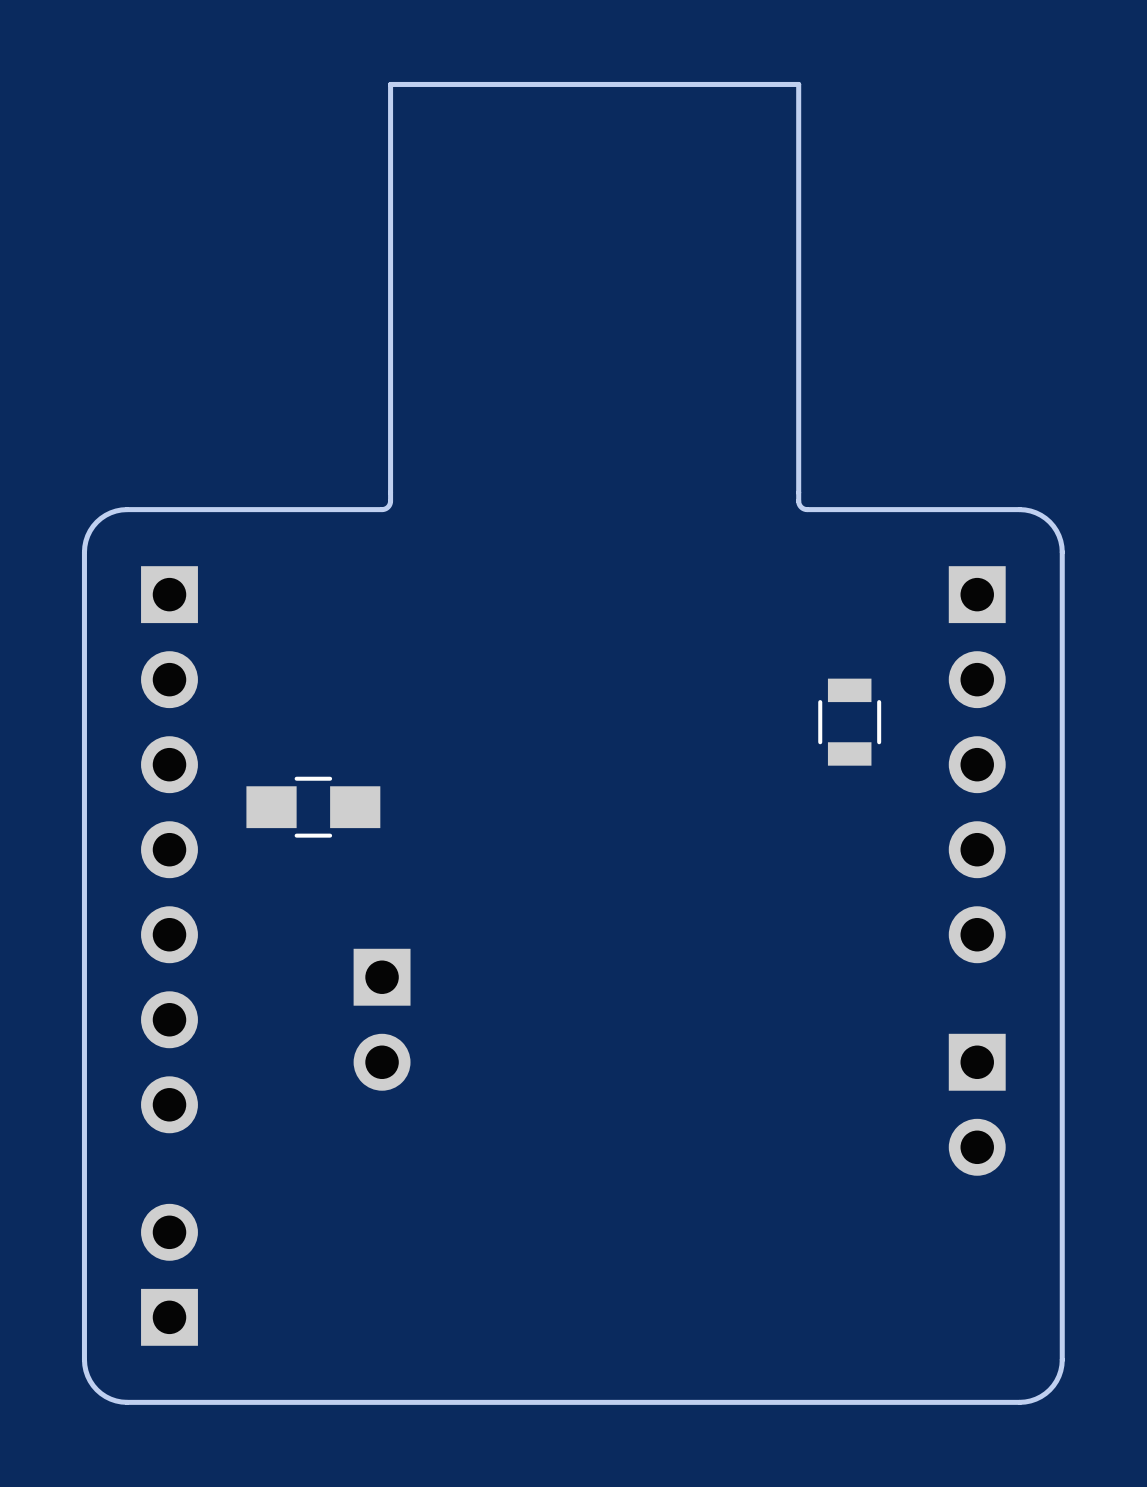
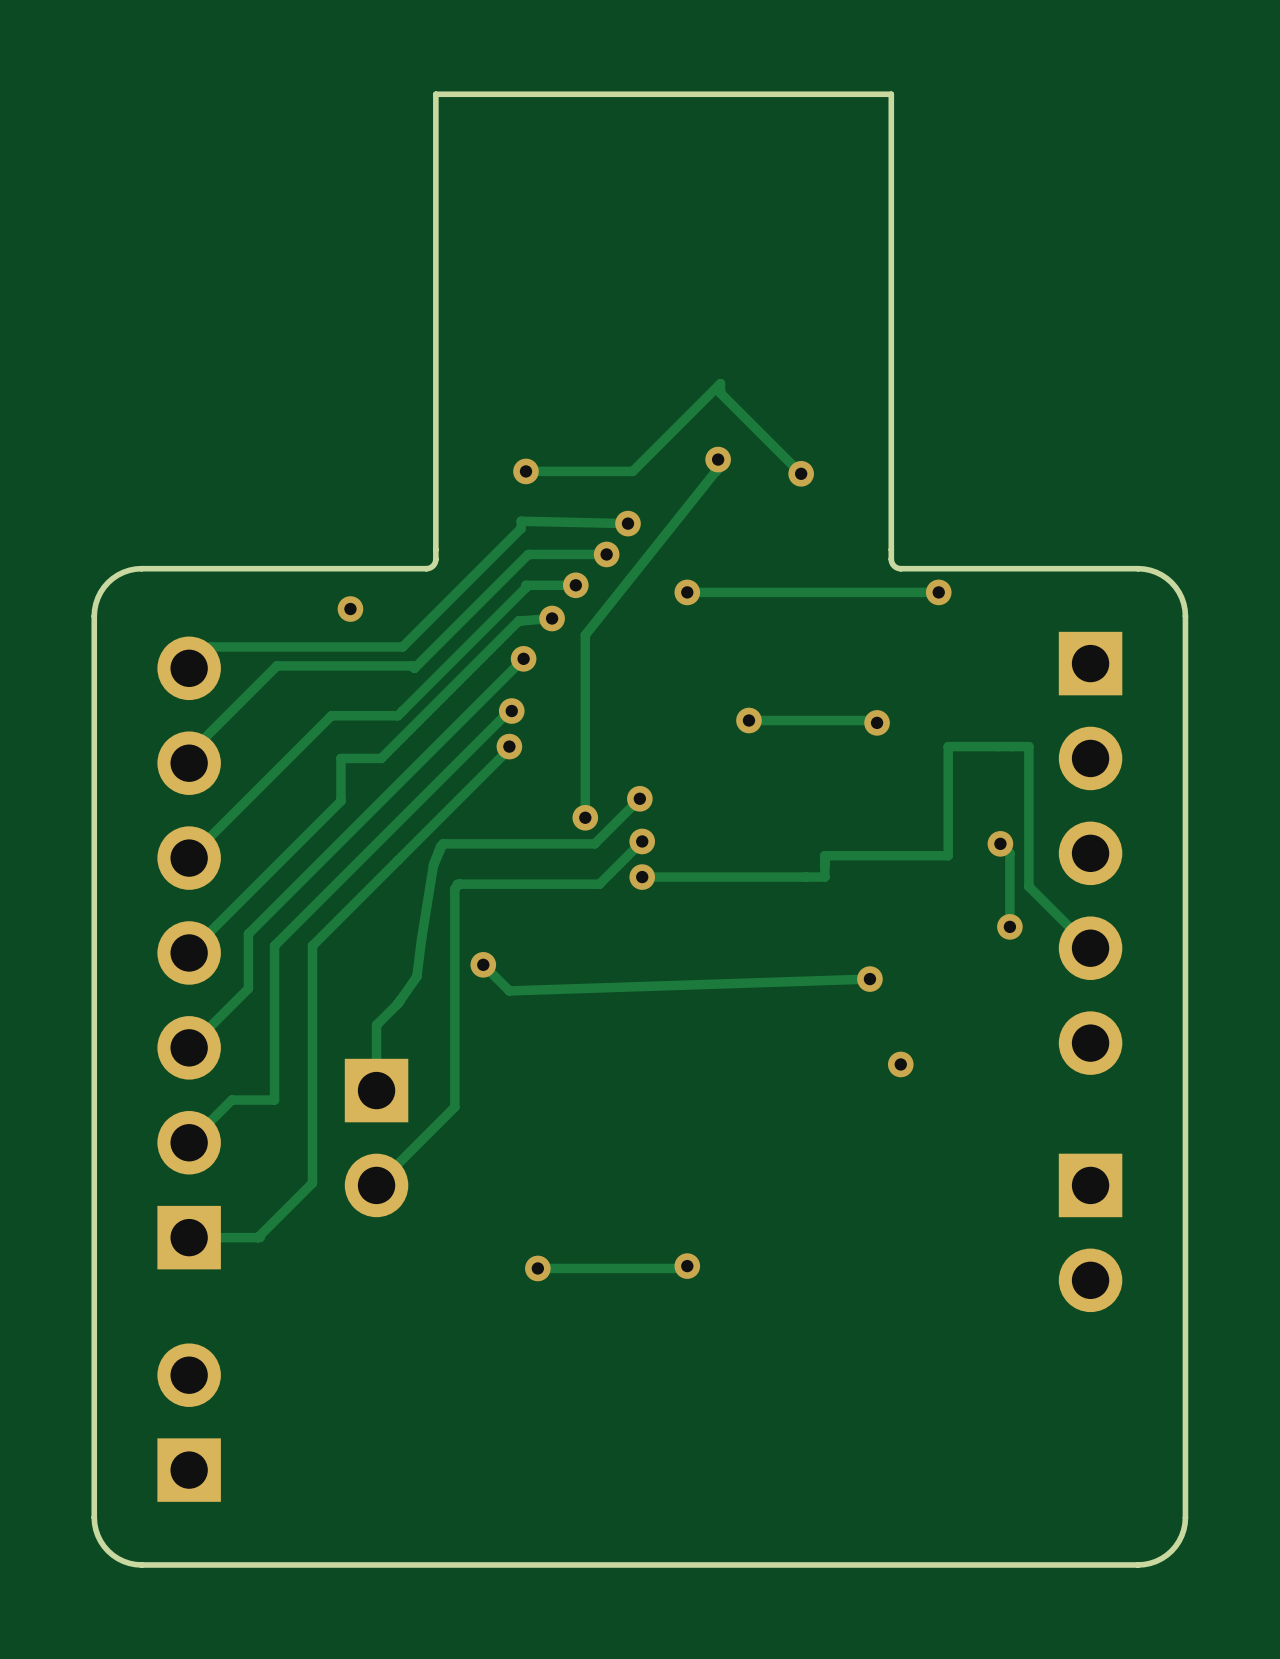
via: none -> (718, 459)
track: none -> (525, 471) (632, 471) (720, 383) (720, 393) (801, 473)
via: none -> (525, 471)
track: none -> (715, 471) (585, 635) (585, 817)
via: none -> (801, 473)
track: none -> (627, 523) (521, 521) (521, 528) (402, 646) (210, 646) (189, 668)
via: none -> (627, 523)
track: none -> (606, 554) (528, 554) (414, 668) (412, 665) (276, 665) (189, 753) (189, 763)
via: none -> (606, 554)
track: none -> (575, 585) (525, 585) (525, 587) (397, 715) (331, 715) (189, 858)
via: none -> (575, 585)
via: none -> (687, 592)
track: none -> (938, 592) (692, 592) (689, 594)
via: none -> (938, 592)
via: none -> (350, 609)
track: none -> (552, 618) (518, 620) (381, 758) (340, 758) (340, 801) (189, 952)
via: none -> (552, 618)
track: none -> (523, 658) (248, 933) (248, 988) (189, 1047)
via: none -> (523, 658)
track: none -> (511, 711) (507, 711) (507, 715) (504, 715) (274, 945) (274, 1100) (231, 1100) (189, 1142)
via: none -> (511, 711)
track: none -> (748, 720) (874, 720) (877, 722)
via: none -> (748, 720)
via: none -> (877, 722)
track: none -> (509, 746) (509, 751) (507, 751) (312, 945) (312, 1183) (257, 1237)
via: none -> (509, 746)
track: none -> (639, 798) (594, 843) (442, 843) (433, 865)
via: none -> (639, 798)
part: (849, 722) -> none
via: none -> (585, 817)
track: none -> (642, 841) (599, 884) (457, 884)
via: none -> (642, 841)
track: none -> (1000, 843) (1009, 853) (1009, 926)
via: none -> (1000, 843)
track: none -> (433, 865) (416, 976) (397, 1003) (376, 1025) (376, 1090)
track: none -> (642, 877) (824, 877) (824, 855) (948, 855) (948, 746) (1028, 746) (1028, 886) (1090, 948)
via: none -> (642, 877)
track: none -> (459, 884) (454, 888) (454, 1107) (376, 1185)
part: (313, 807) -> none
via: none -> (1009, 926)
part rotation: 0° (169, 849) -> 180° (189, 952)
track: none -> (483, 964) (509, 990) (869, 979)
via: none -> (483, 964)
via: none -> (869, 979)
via: none -> (900, 1064)
part position: (382, 1019) -> (376, 1138)
track: none -> (260, 1237) (189, 1237)
track: none -> (687, 1266) (684, 1268) (537, 1268)
via: none -> (687, 1266)
via: none -> (537, 1268)

